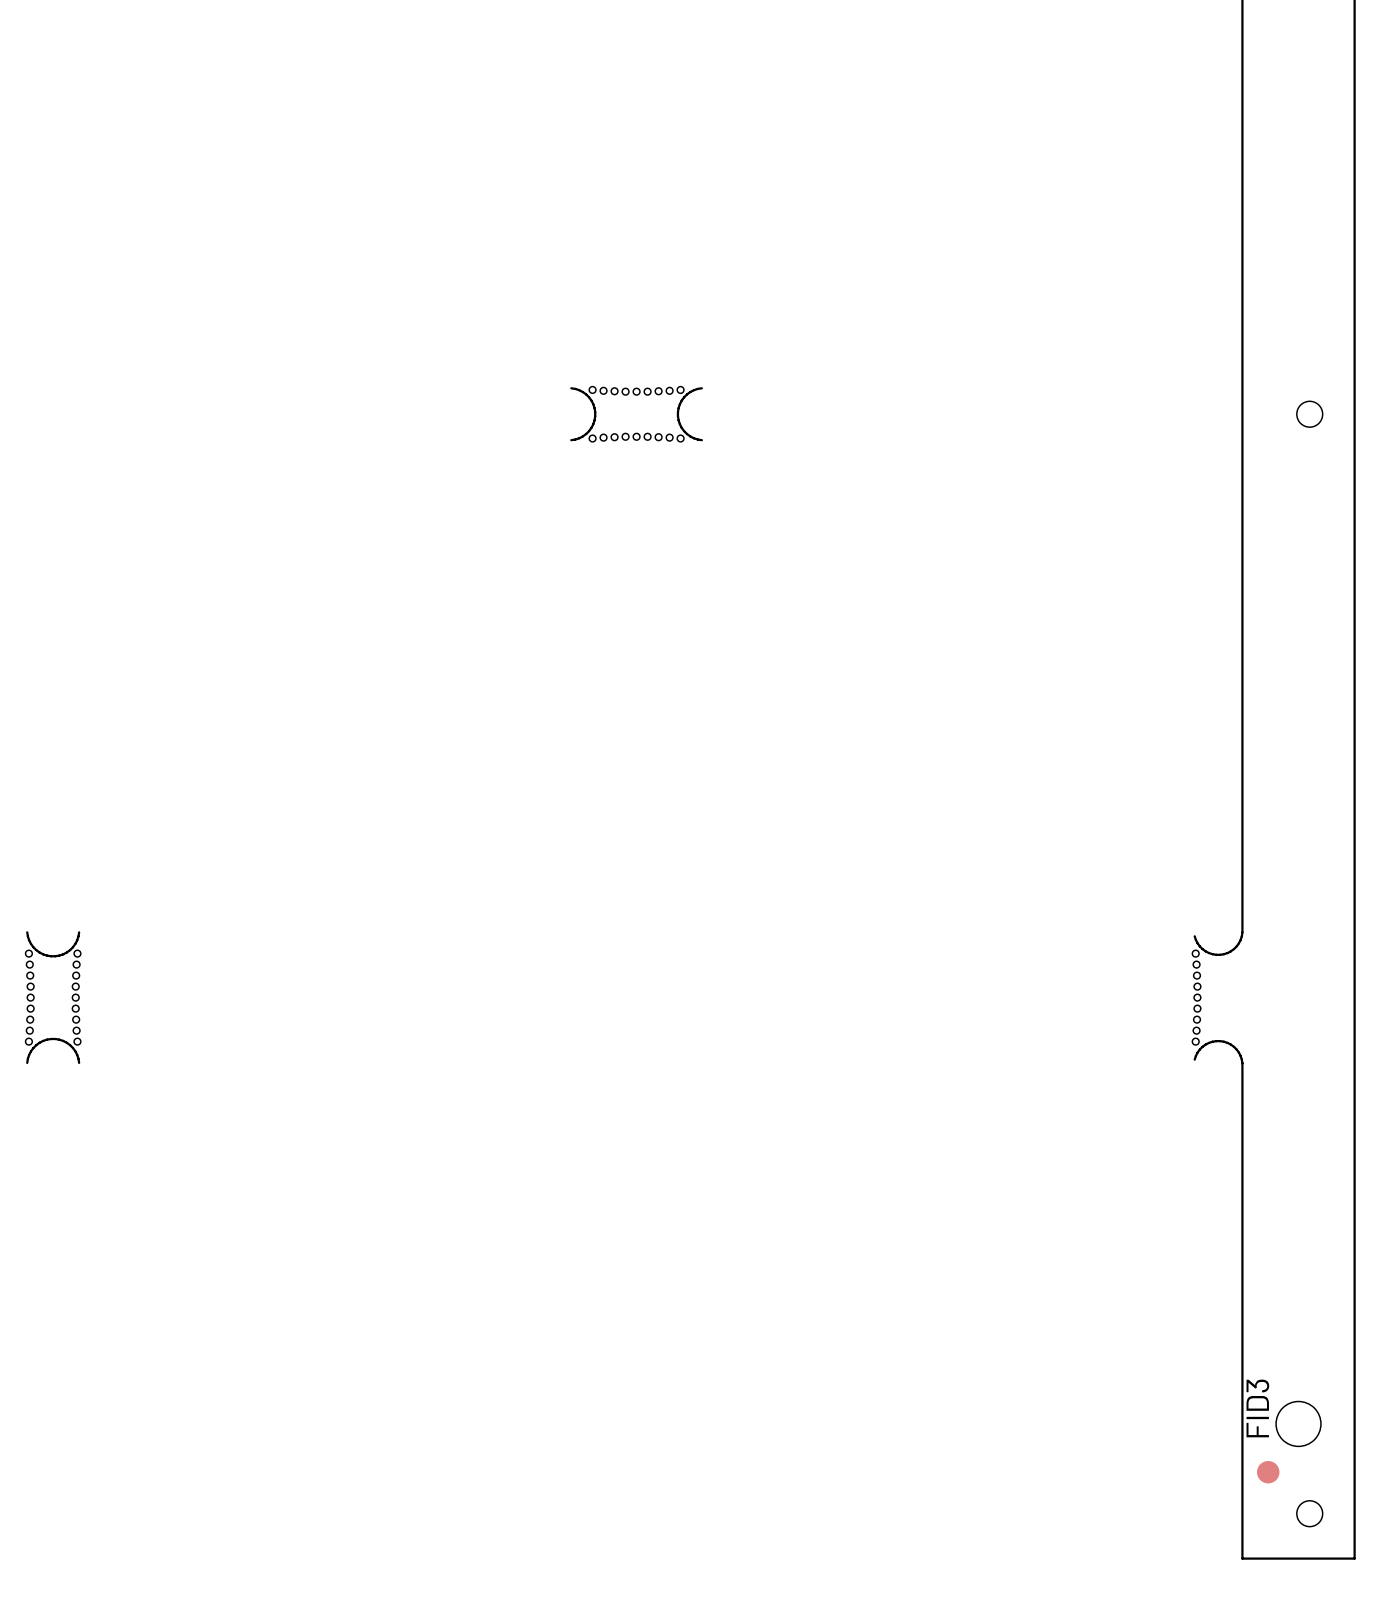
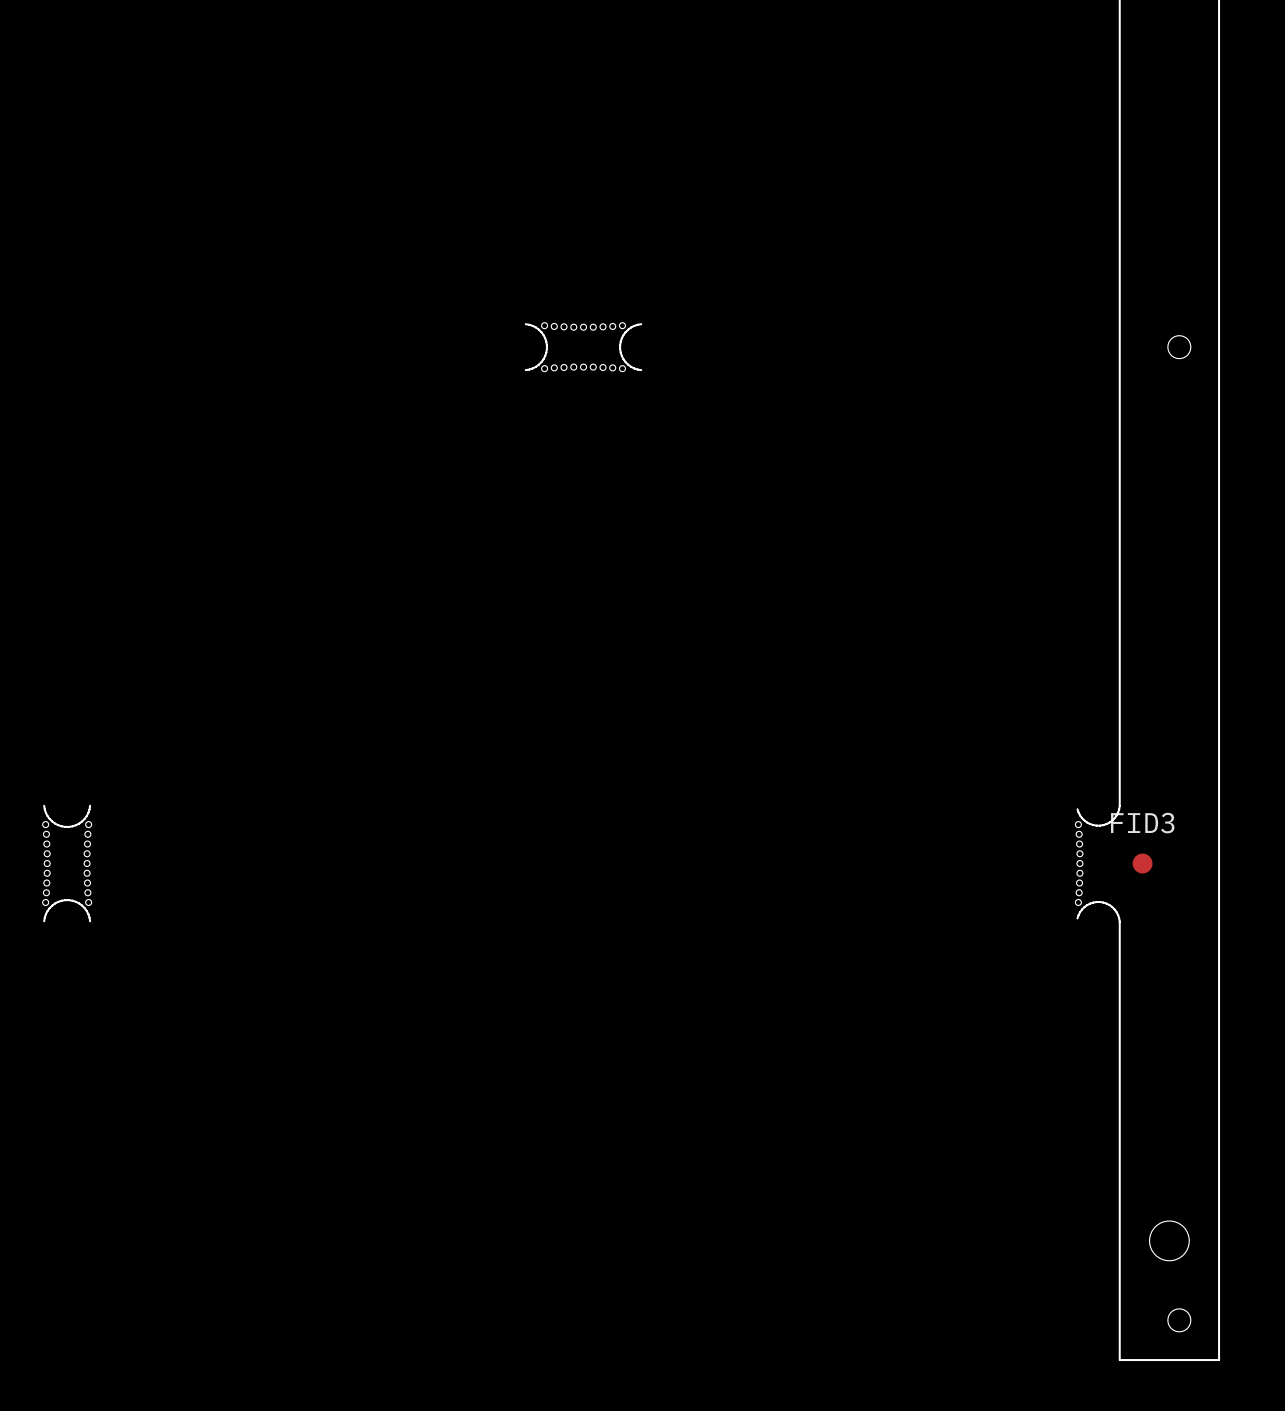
FID3 name rotation: 0° (1257, 1408) -> 90° clockwise (1142, 823)
FID3 position: (1268, 1472) -> (1142, 863)

